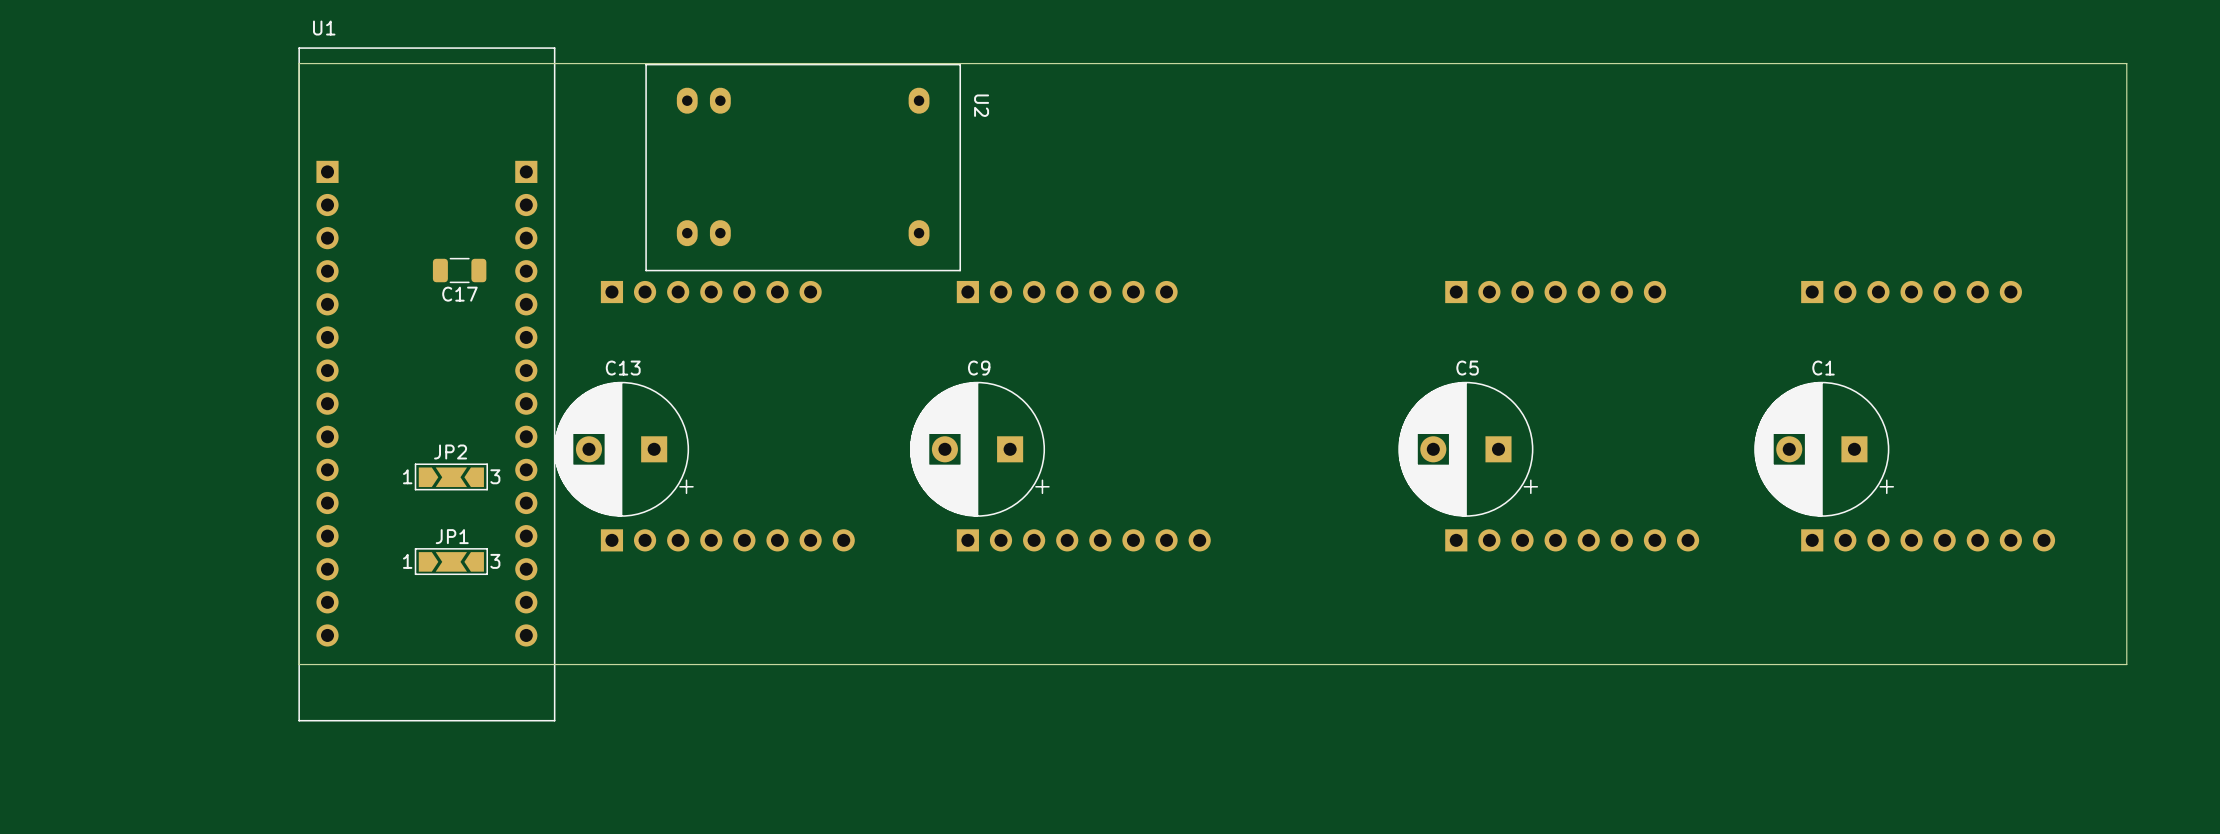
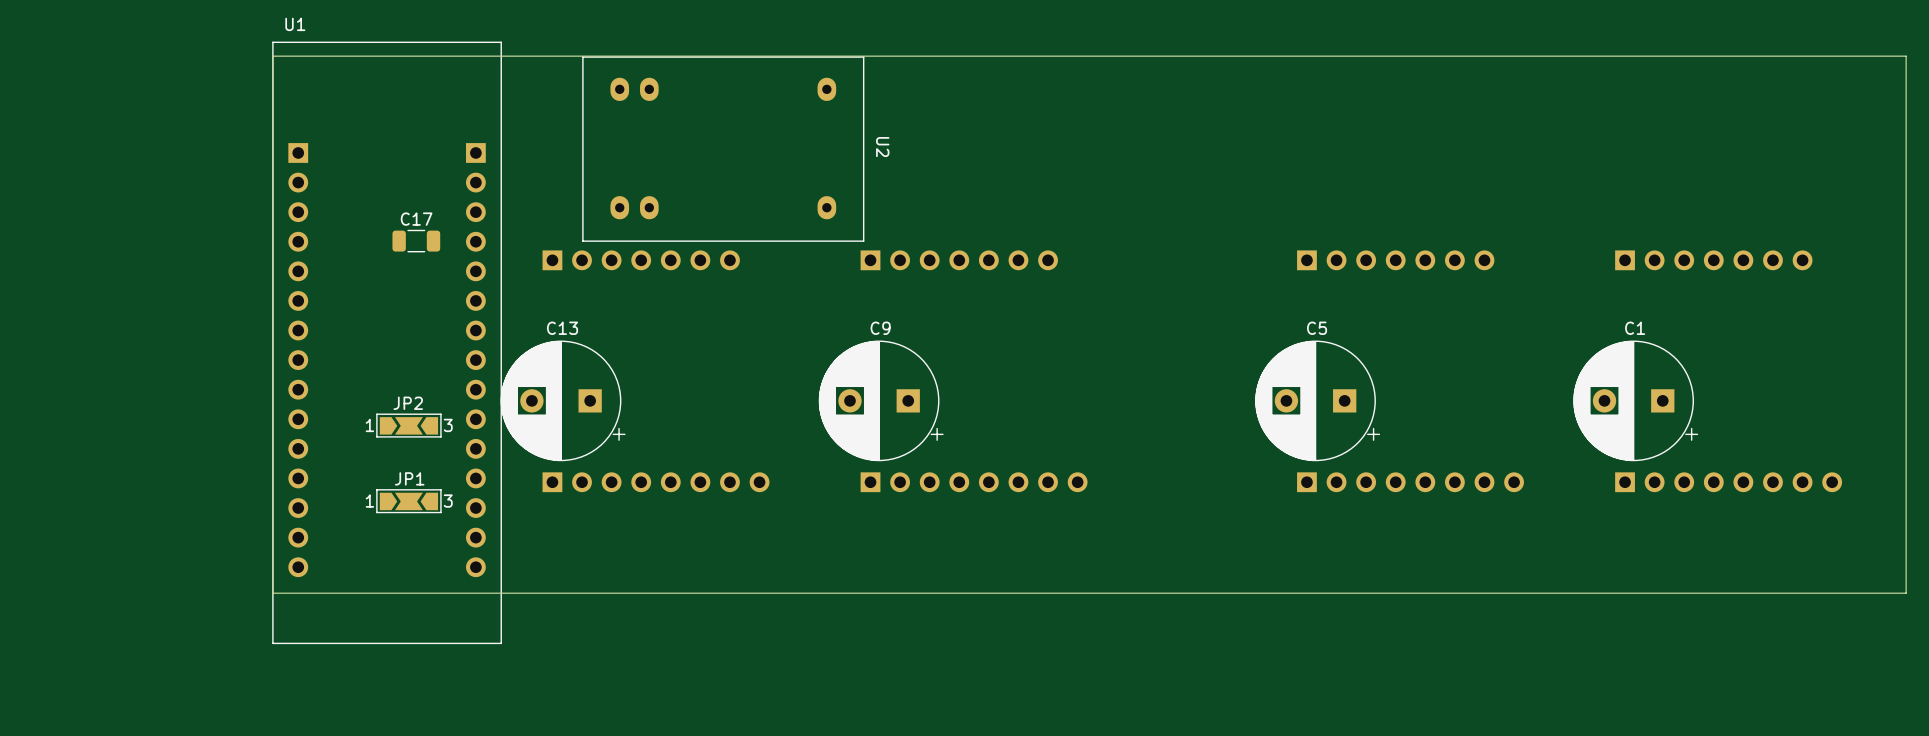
U2 name position: U2 (981, 105) -> U2 (882, 147)
C17 name position: C17 (459, 294) -> C17 (416, 219)

